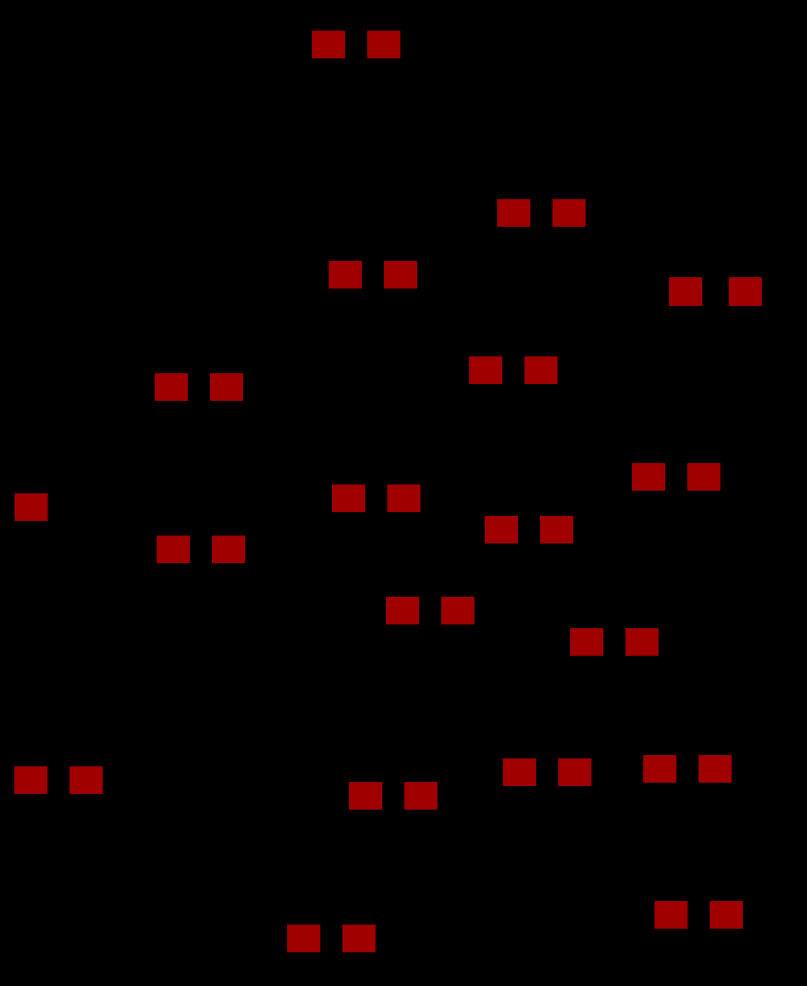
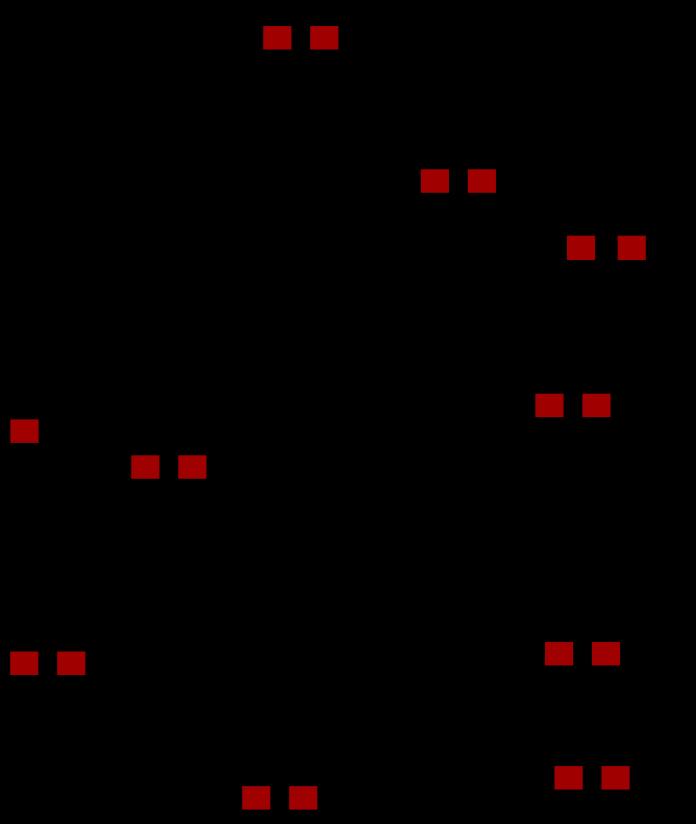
part: (372, 274) -> none
part: (513, 370) -> none
part: (198, 387) -> none
part: (376, 498) -> none
part: (529, 529) -> none
part: (430, 610) -> none
part: (614, 641) -> none
part: (547, 772) -> none
part: (393, 795) -> none

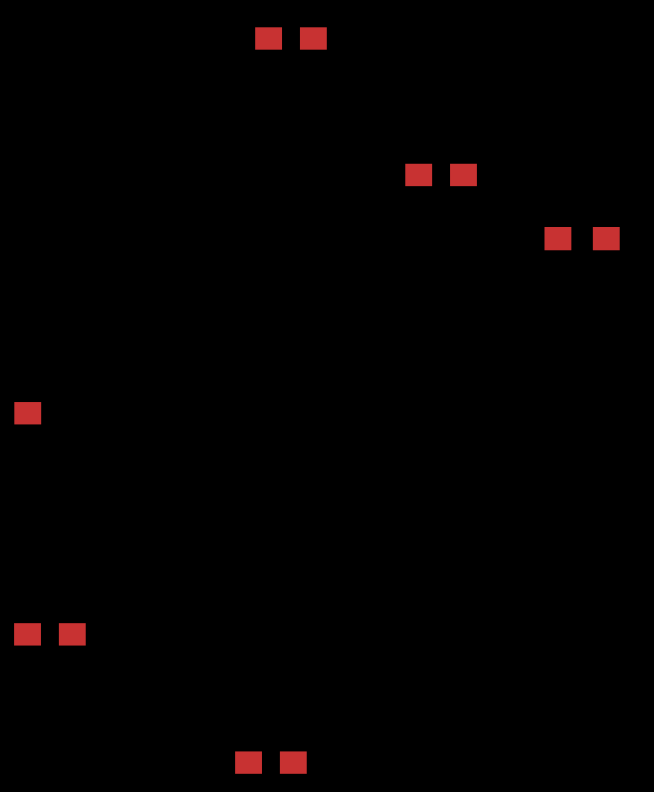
part: (572, 405) -> none
part: (168, 467) -> none
part: (582, 653) -> none
part: (592, 777) -> none

